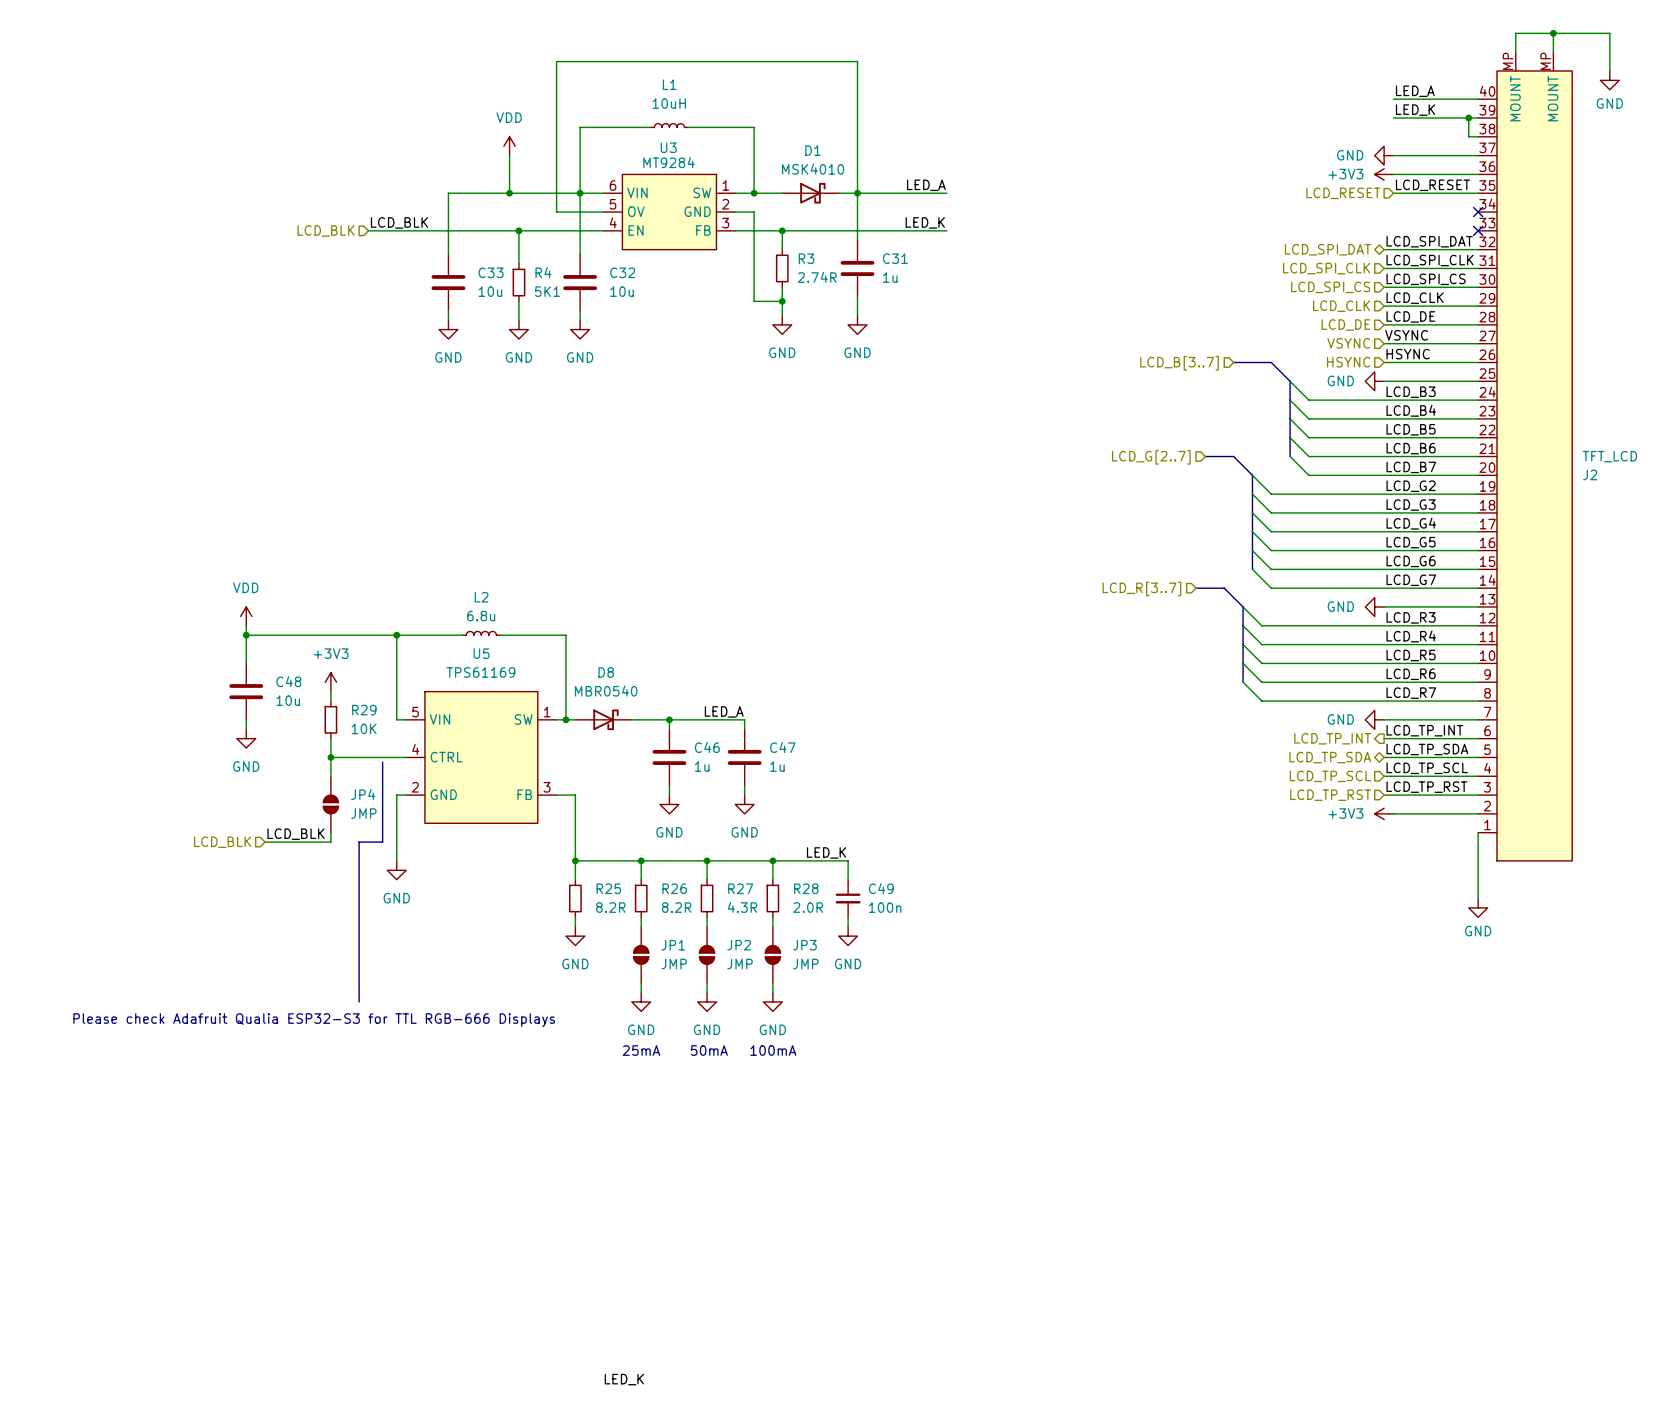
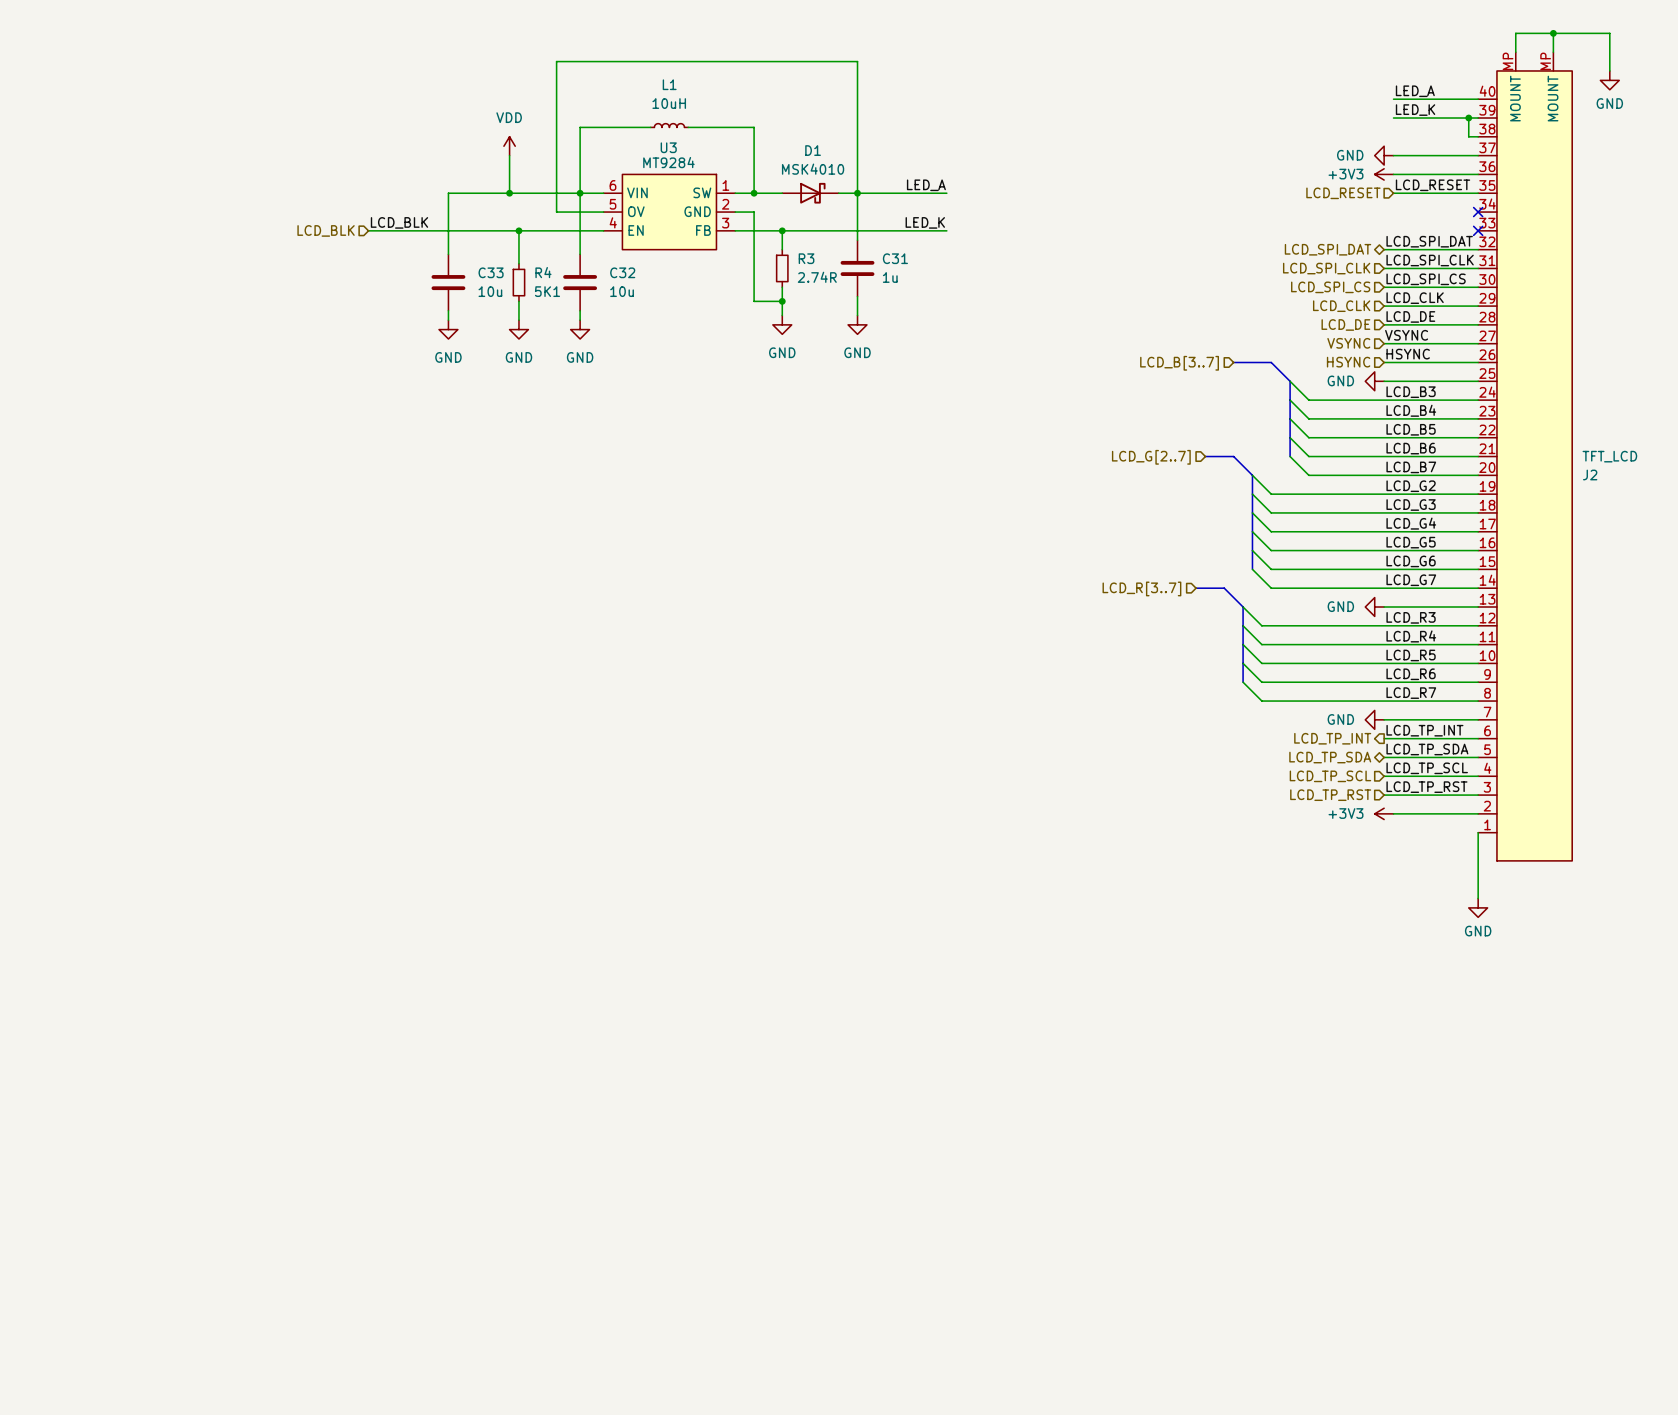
power symbol: VDD (246, 616) -> none
wire: (246, 625) (246, 663) -> none
L2: 6.8u (481, 633) -> none
wire: (246, 635) (462, 635) -> none
junction: (246, 635) -> none
wire: (396, 635) (396, 719) (406, 719) -> none
junction: (396, 635) -> none
wire: (500, 635) (565, 635) (565, 719) -> none
power symbol: +3V3 (330, 682) -> none
C48: 10u (246, 691) -> none
wire: (330, 691) (330, 701) -> none
label: LED_A (724, 711) -> none
wire: (246, 719) (246, 729) -> none
R29: 10K (330, 719) -> none
wire: (556, 719) (575, 719) -> none
junction: (565, 719) -> none
D8: MBR0540 (603, 719) -> none
wire: (631, 719) (744, 719) (744, 729) -> none
wire: (669, 719) (669, 729) -> none
junction: (669, 719) -> none
power symbol: GND (246, 738) -> none
wire: (330, 738) (330, 776) -> none
wire: (330, 757) (406, 757) -> none
junction: (330, 757) -> none
U5: TPS61169 (481, 757) -> none
C46: 1u (669, 757) -> none
C47: 1u (744, 757) -> none
line: (382, 762) (382, 842) (359, 842) (359, 1001) -> none
wire: (669, 785) (669, 795) -> none
wire: (744, 785) (744, 795) -> none
wire: (406, 795) (396, 795) (396, 860) -> none
wire: (556, 795) (575, 795) (575, 879) -> none
JP4: JMP (330, 804) -> none
power symbol: GND (669, 804) -> none
power symbol: GND (744, 804) -> none
wire: (330, 832) (330, 842) (265, 842) -> none
label: LCD_BLK (296, 834) -> none
hierarchical label: LCD_BLK (222, 842) -> none
label: LED_K (826, 852) -> none
wire: (575, 860) (848, 860) (848, 879) -> none
junction: (575, 860) -> none
wire: (641, 860) (641, 879) -> none
junction: (641, 860) -> none
wire: (707, 860) (707, 879) -> none
junction: (707, 860) -> none
wire: (772, 860) (772, 879) -> none
junction: (772, 860) -> none
power symbol: GND (396, 870) -> none
R25: 8.2R (575, 898) -> none
R26: 8.2R (641, 898) -> none
R27: 4.3R (707, 898) -> none
R28: 2.0R (772, 898) -> none
C49: 100n (848, 898) -> none
wire: (575, 917) (575, 926) -> none
wire: (641, 917) (641, 926) -> none
wire: (707, 917) (707, 926) -> none
wire: (772, 917) (772, 926) -> none
wire: (848, 917) (848, 926) -> none
power symbol: GND (575, 936) -> none
power symbol: GND (848, 936) -> none
JP1: JMP (641, 954) -> none
JP2: JMP (707, 954) -> none
JP3: JMP (772, 954) -> none
wire: (641, 983) (641, 992) -> none
wire: (707, 983) (707, 992) -> none
wire: (772, 983) (772, 992) -> none
power symbol: GND (641, 1001) -> none
power symbol: GND (707, 1001) -> none
power symbol: GND (772, 1001) -> none
text: Please check Adafruit Qualia ESP32-S3 for TTL RGB-666 Displays (314, 1020) -> none
text: 25mA (641, 1050) -> none
text: 50mA (709, 1050) -> none
text: 100mA (773, 1050) -> none
label: LED_K (624, 1379) -> none

